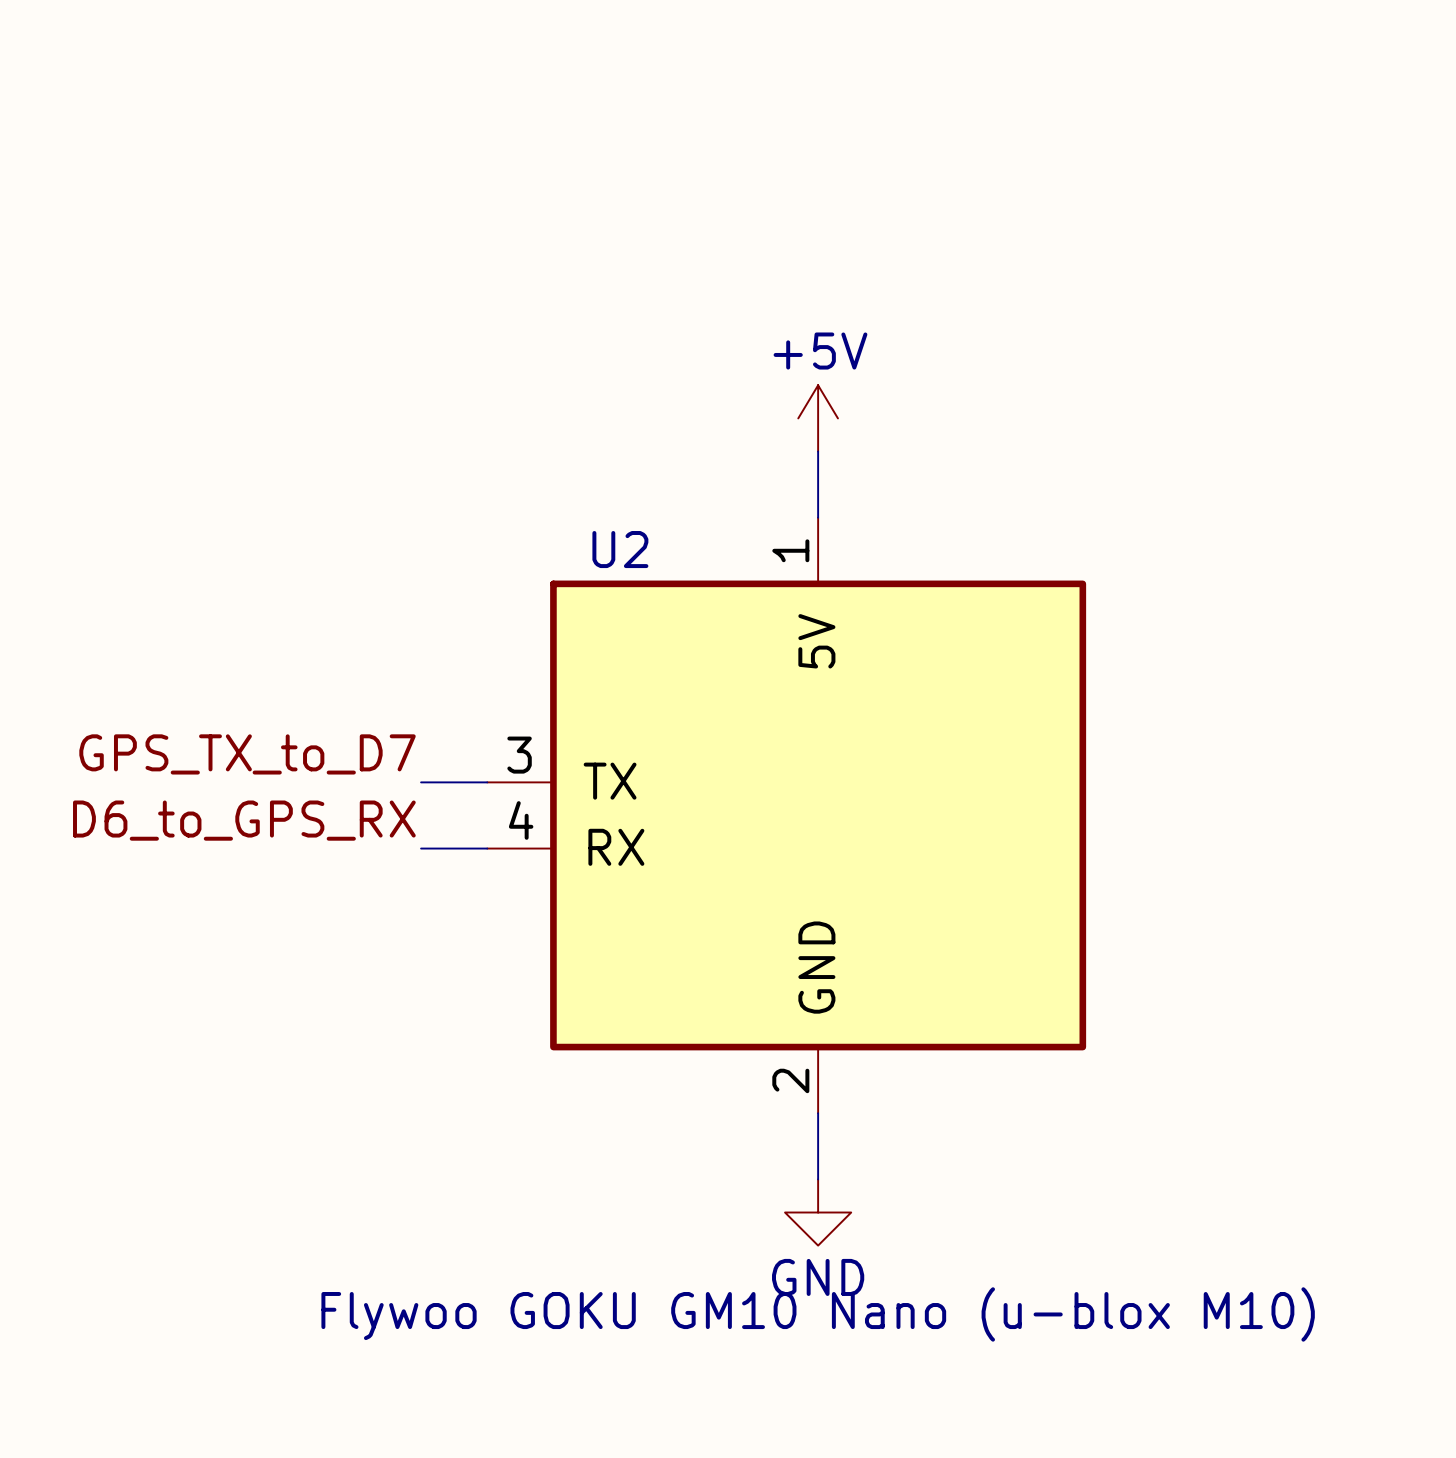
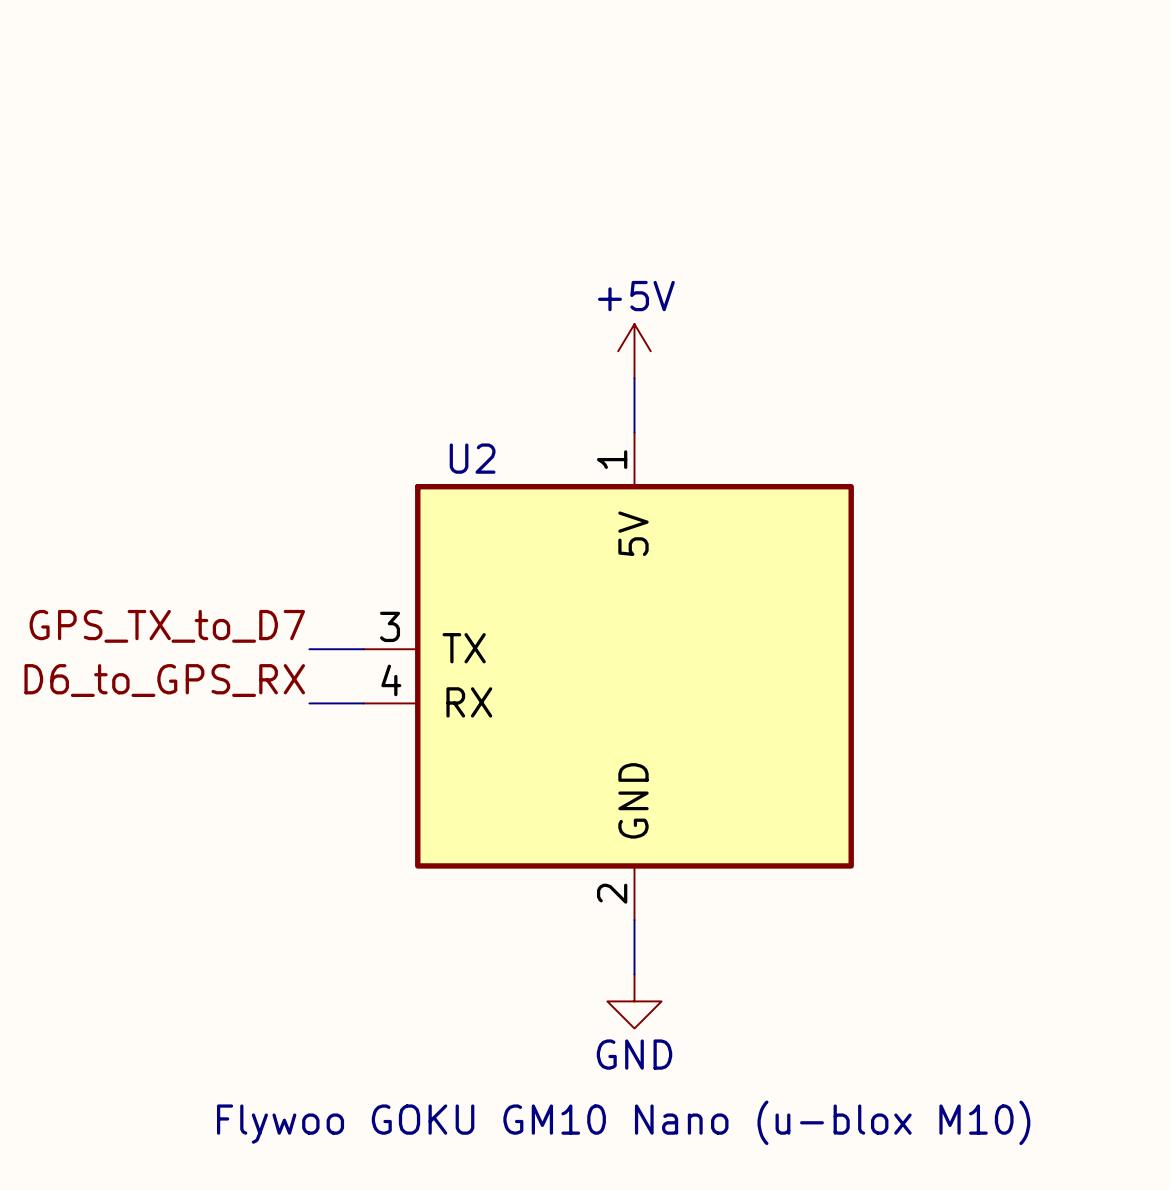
U2 value position: Flywoo GOKU GM10 Nano (u-blox M10) (818, 1314) -> Flywoo GOKU GM10 Nano (u-blox M10) (623, 1122)

